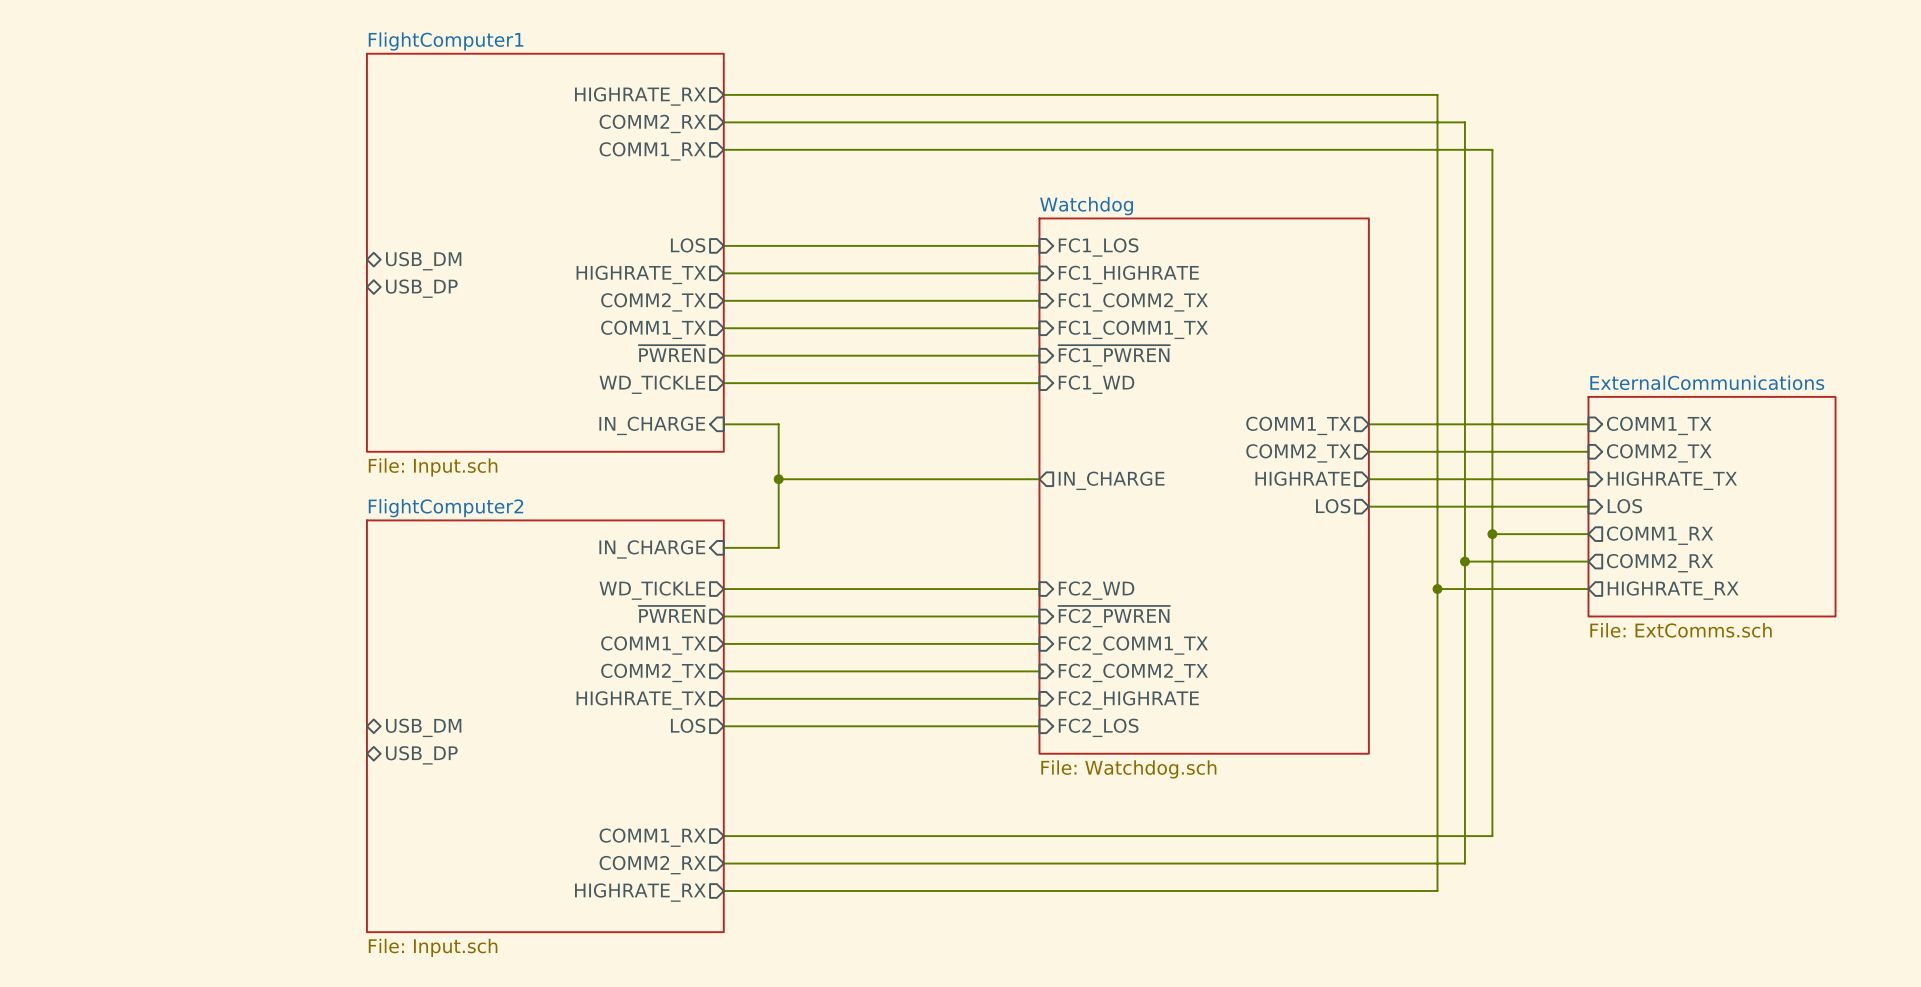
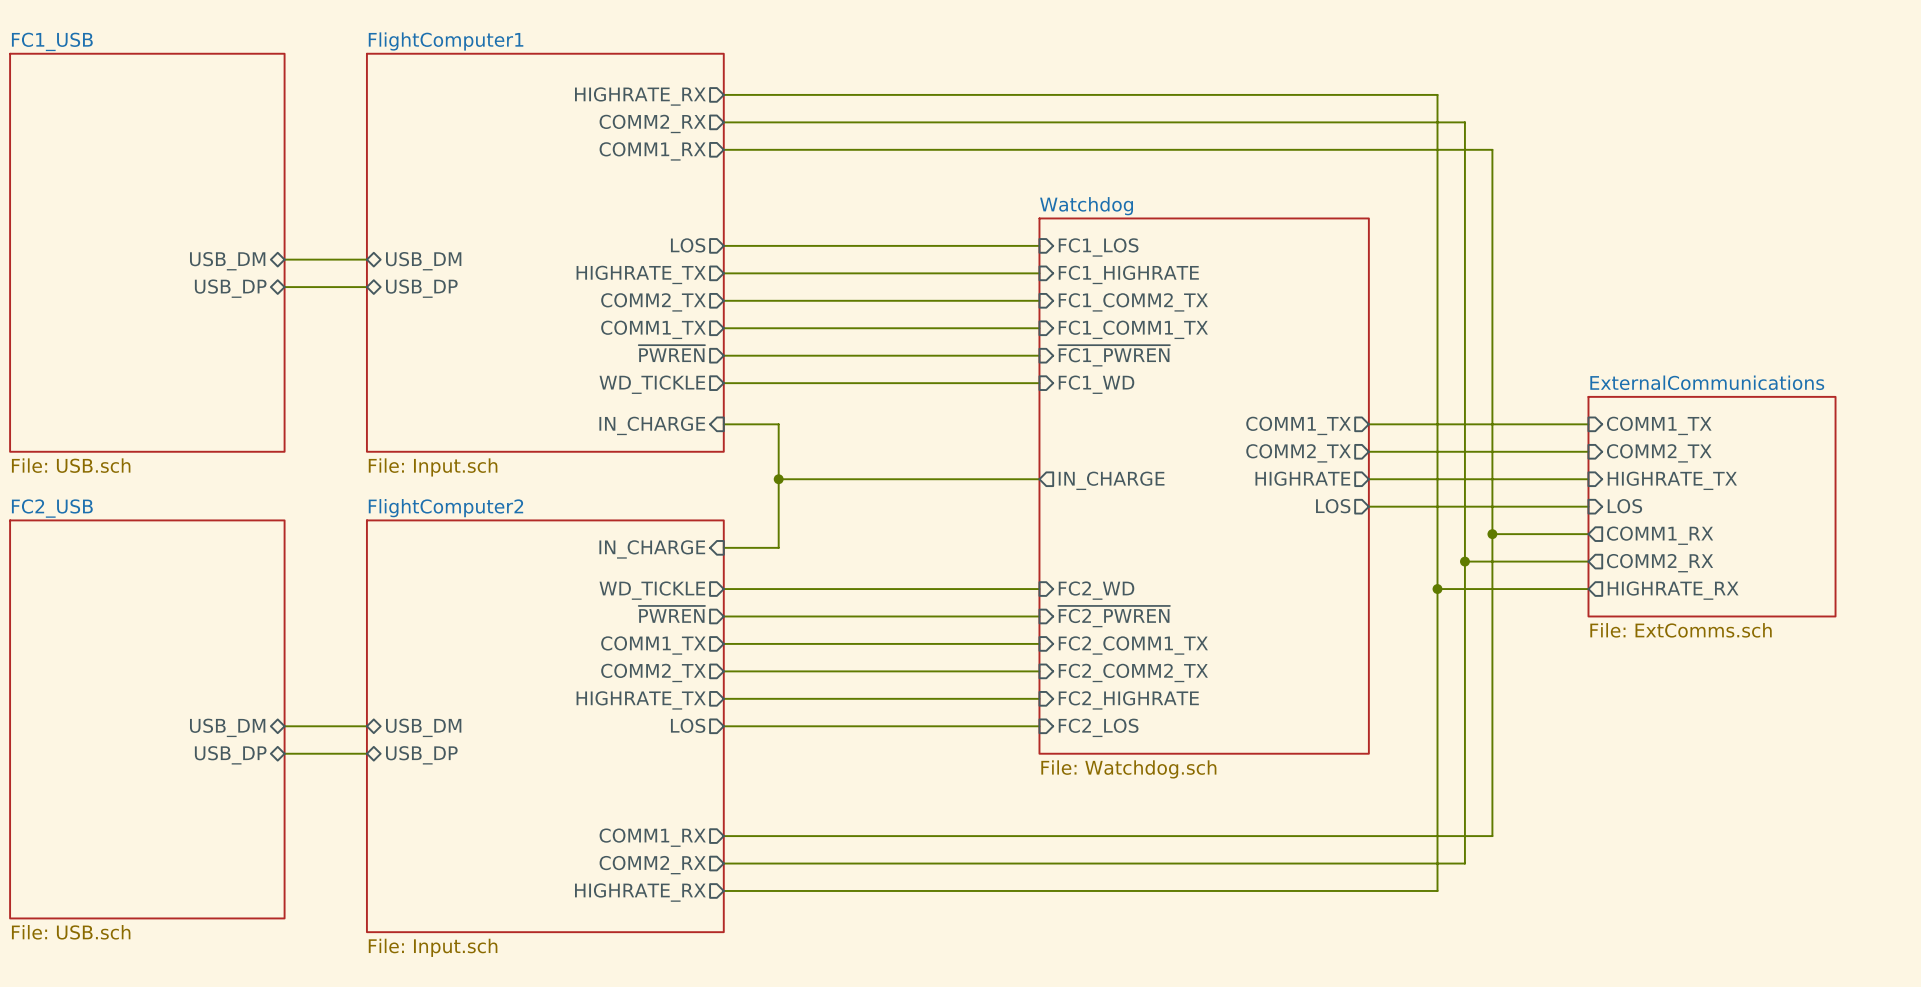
sheet FC1_USB: none -> File: USB.sch (147, 252)
wire: none -> (284, 259) (366, 259)
sheet pin: none -> USB_DM (227, 261)
wire: none -> (284, 287) (366, 287)
sheet pin: none -> USB_DP (230, 288)
sheet FC2_USB: none -> File: USB.sch (147, 719)
wire: none -> (284, 726) (366, 726)
sheet pin: none -> USB_DM (227, 727)
wire: none -> (284, 753) (366, 753)
sheet pin: none -> USB_DP (230, 755)

